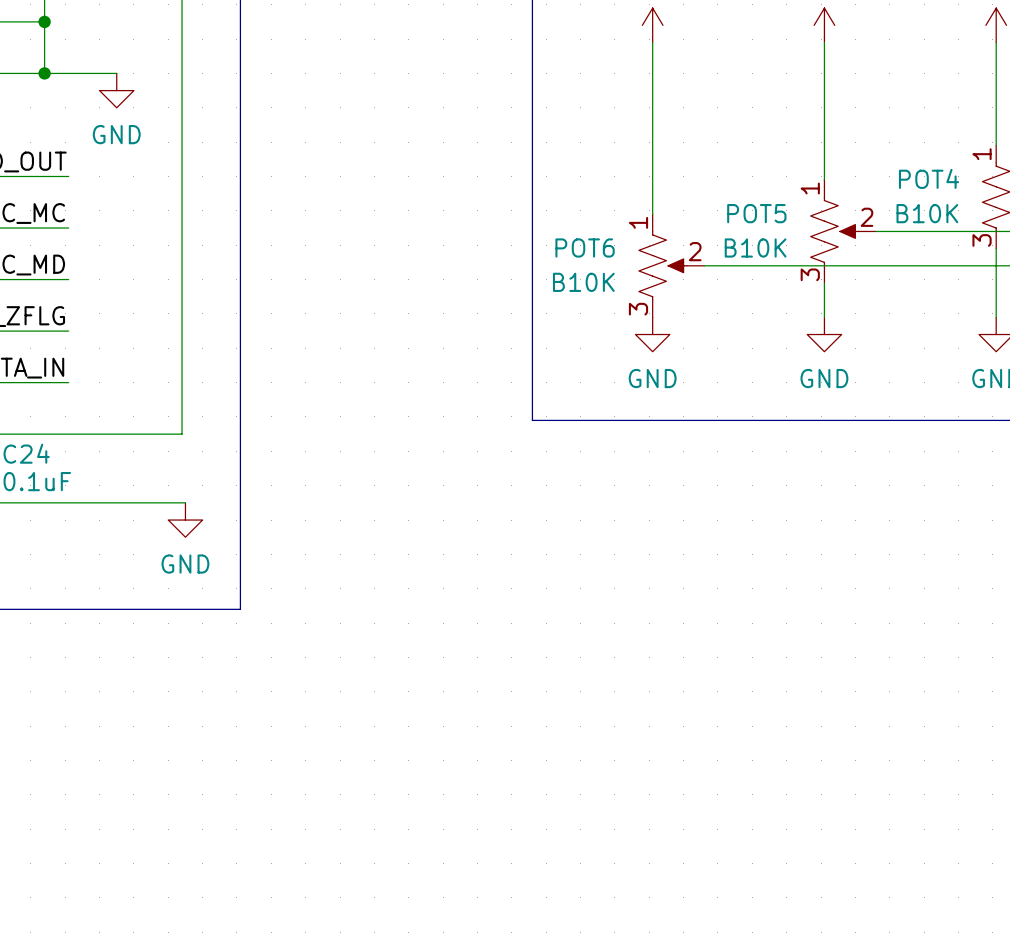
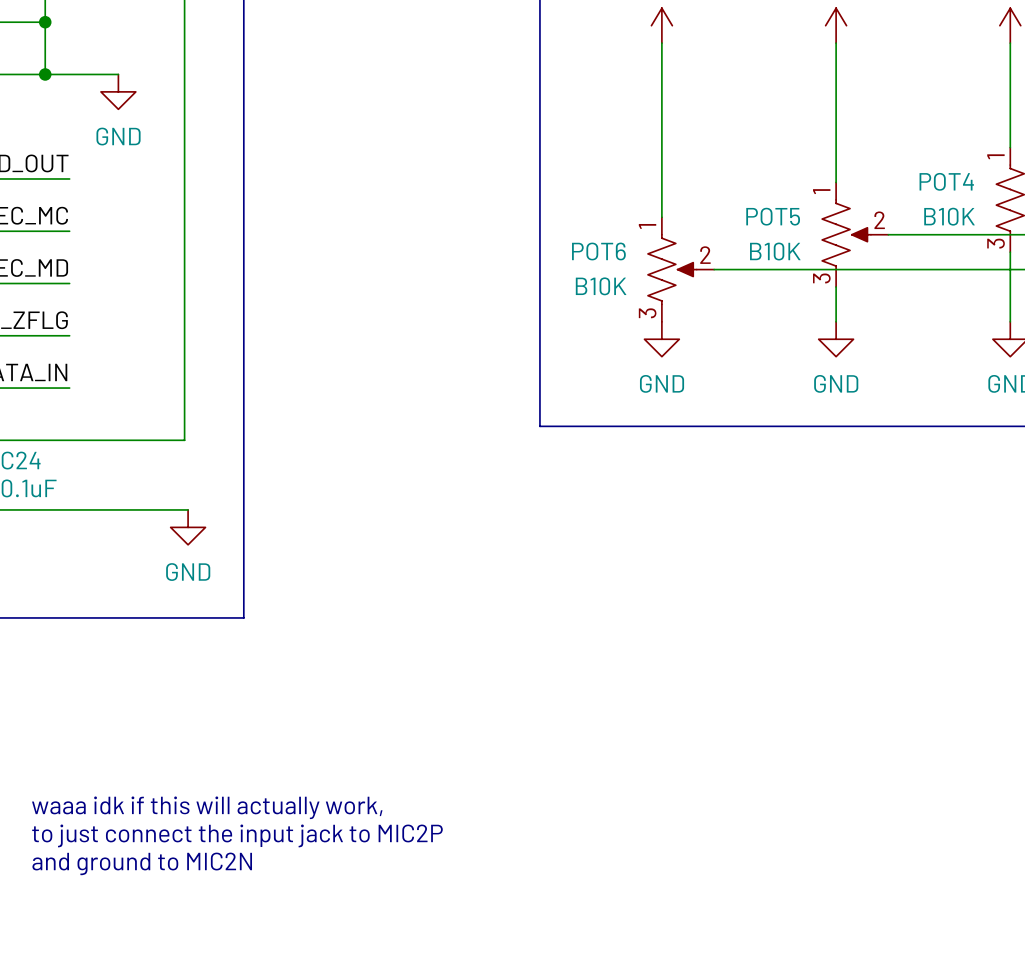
text: none -> waaa idk if this will actually work, (207, 807)
text: none -> to just connect the input jack to MIC2P (237, 835)
text: none -> and ground to MIC2N (142, 863)

